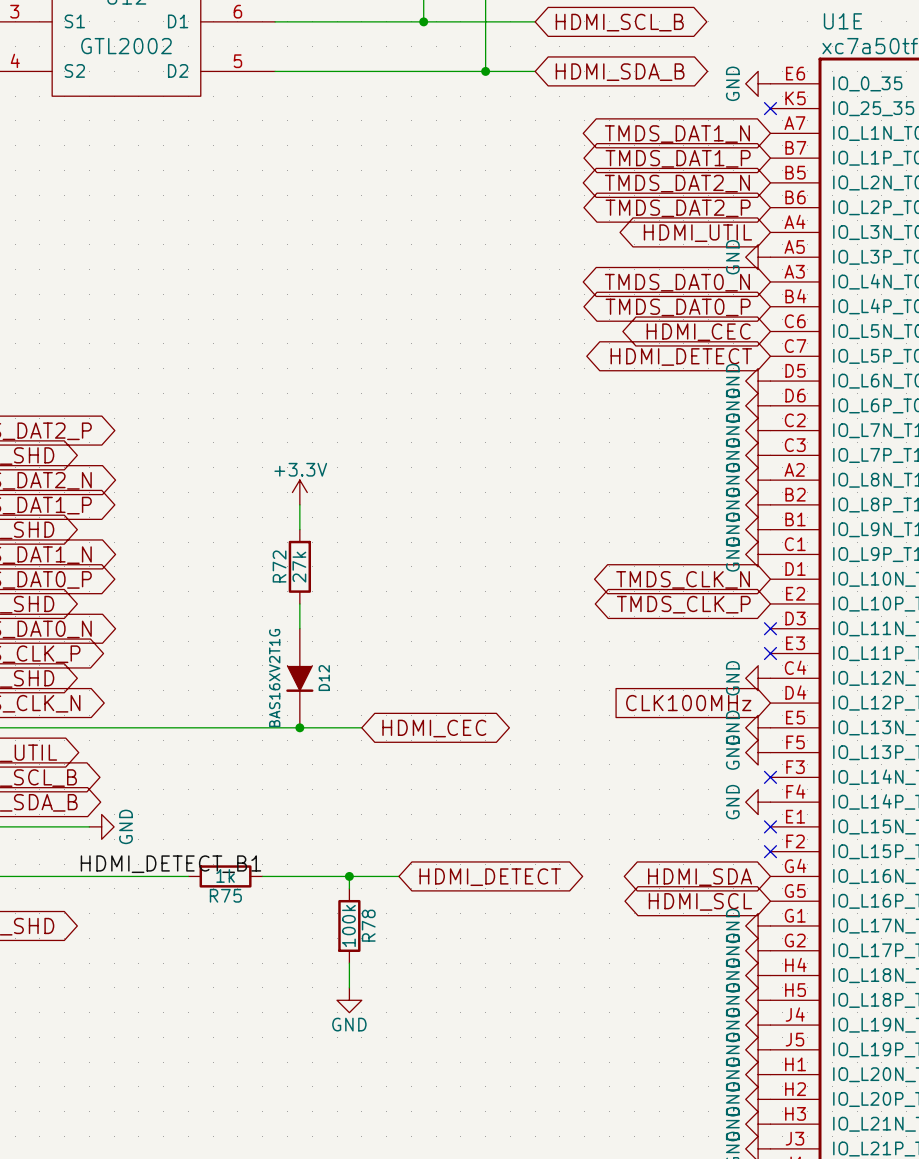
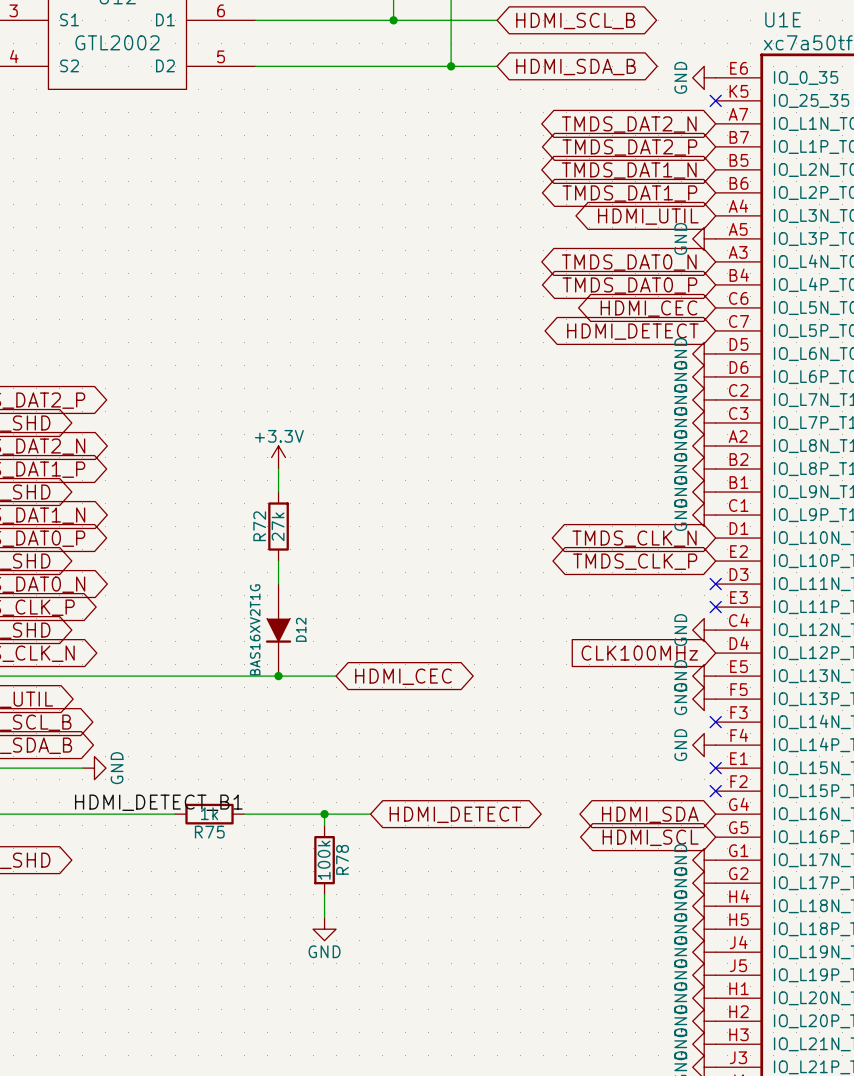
global label: TMDS_DAT1_N (677, 134) -> TMDS_DAT2_N (629, 124)
global label: TMDS_DAT1_P (678, 158) -> TMDS_DAT2_P (629, 147)
global label: TMDS_DAT2_N (677, 183) -> TMDS_DAT1_N (629, 170)
global label: TMDS_DAT2_P (678, 208) -> TMDS_DAT1_P (629, 193)

